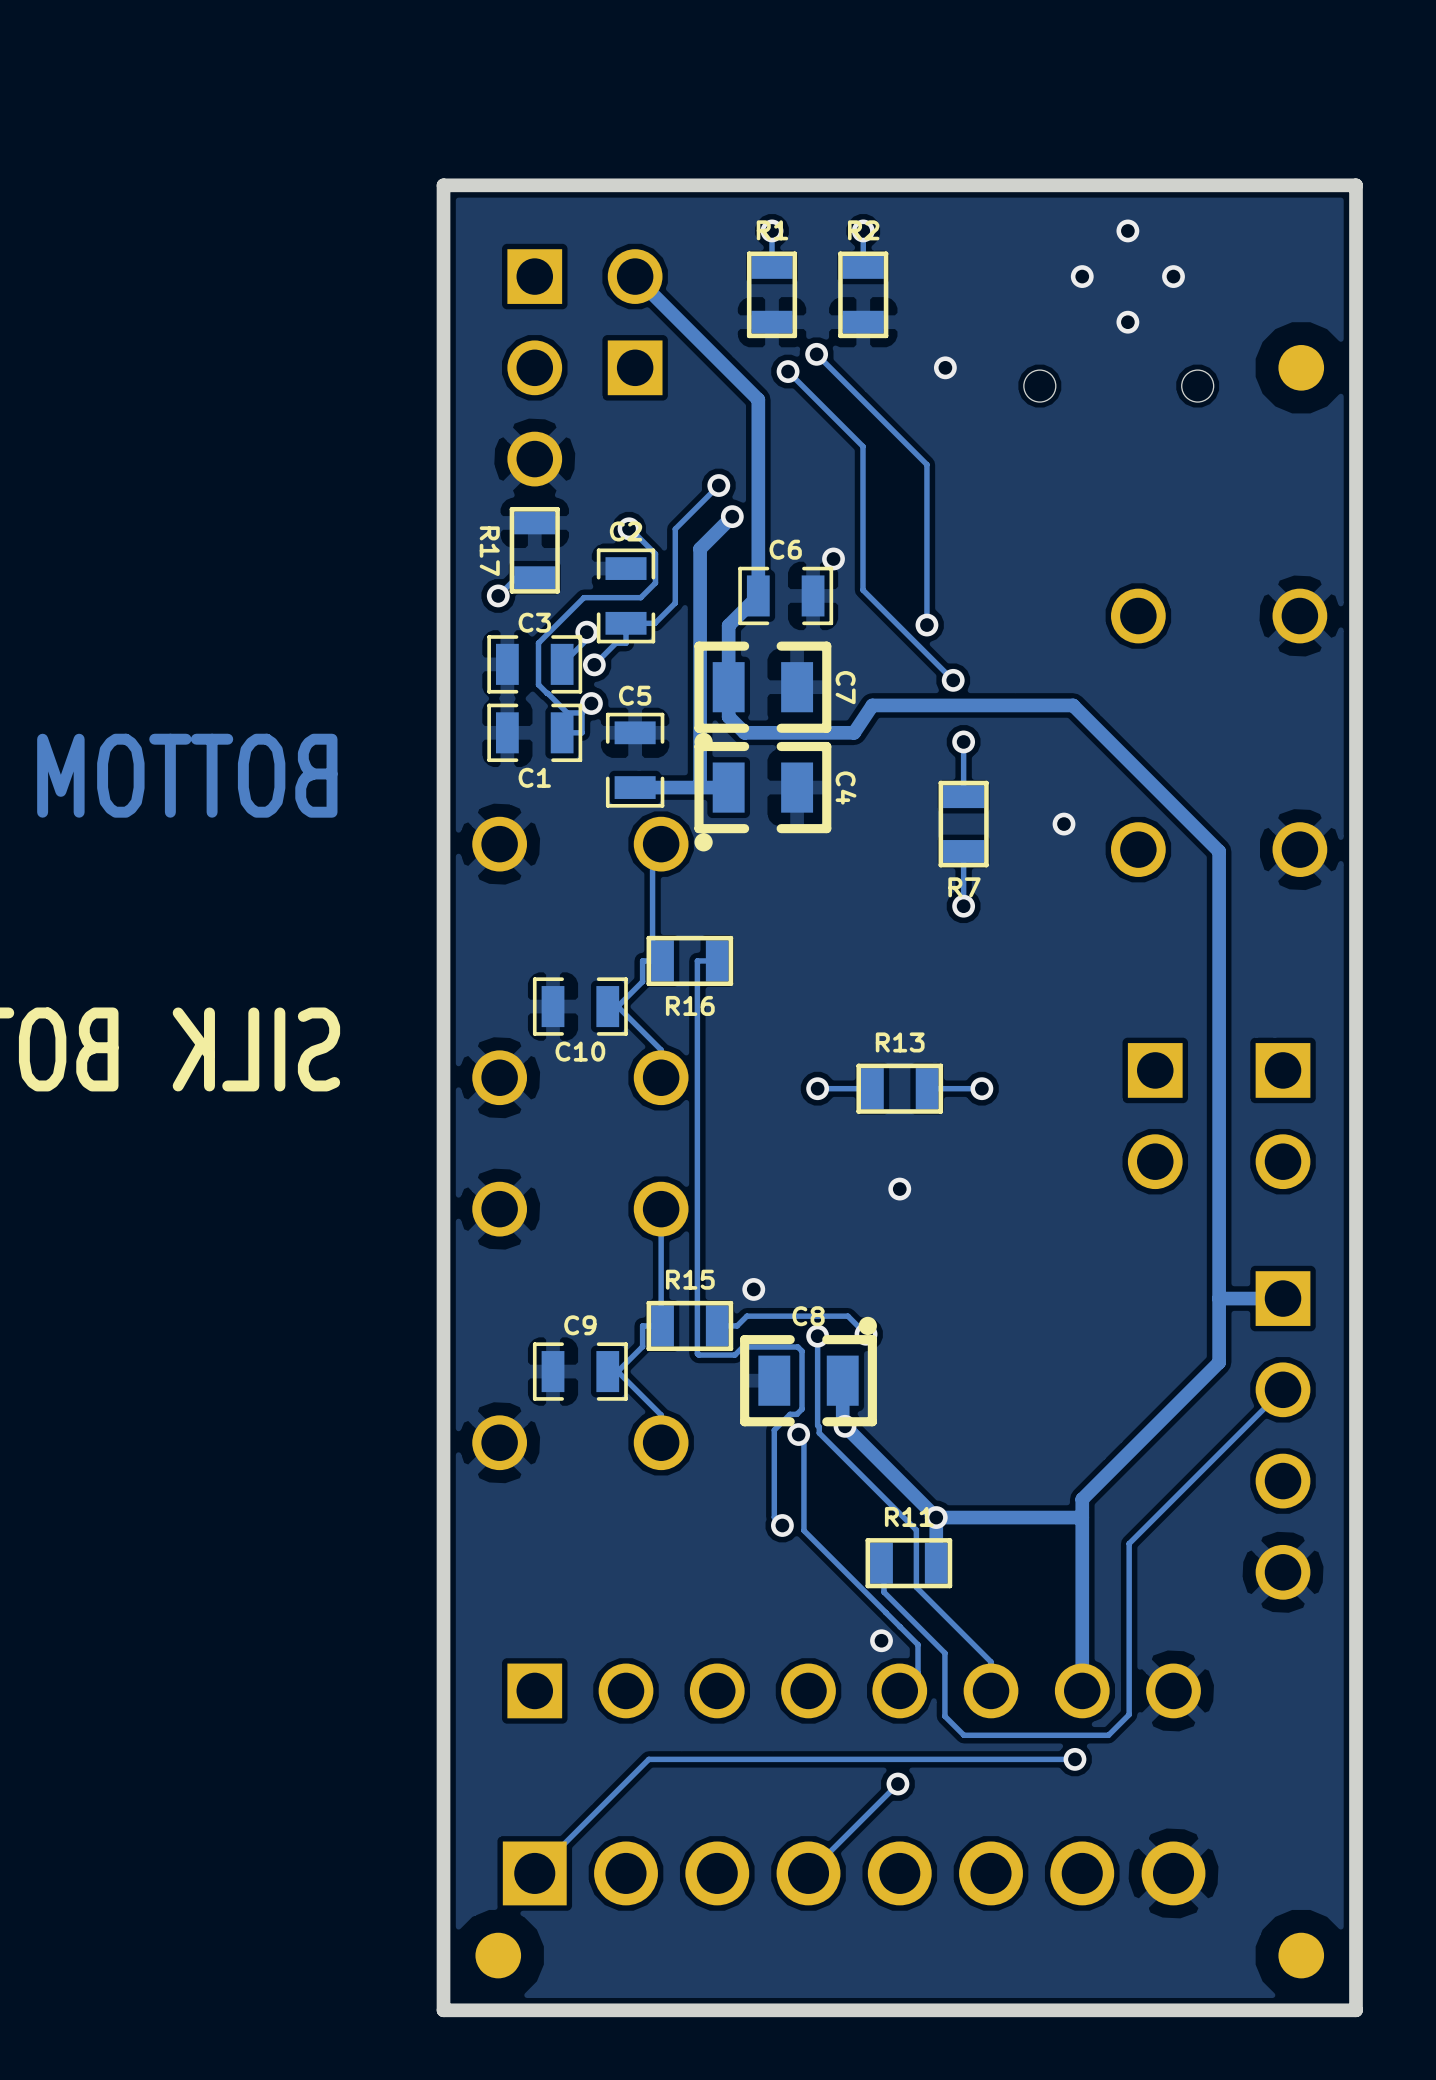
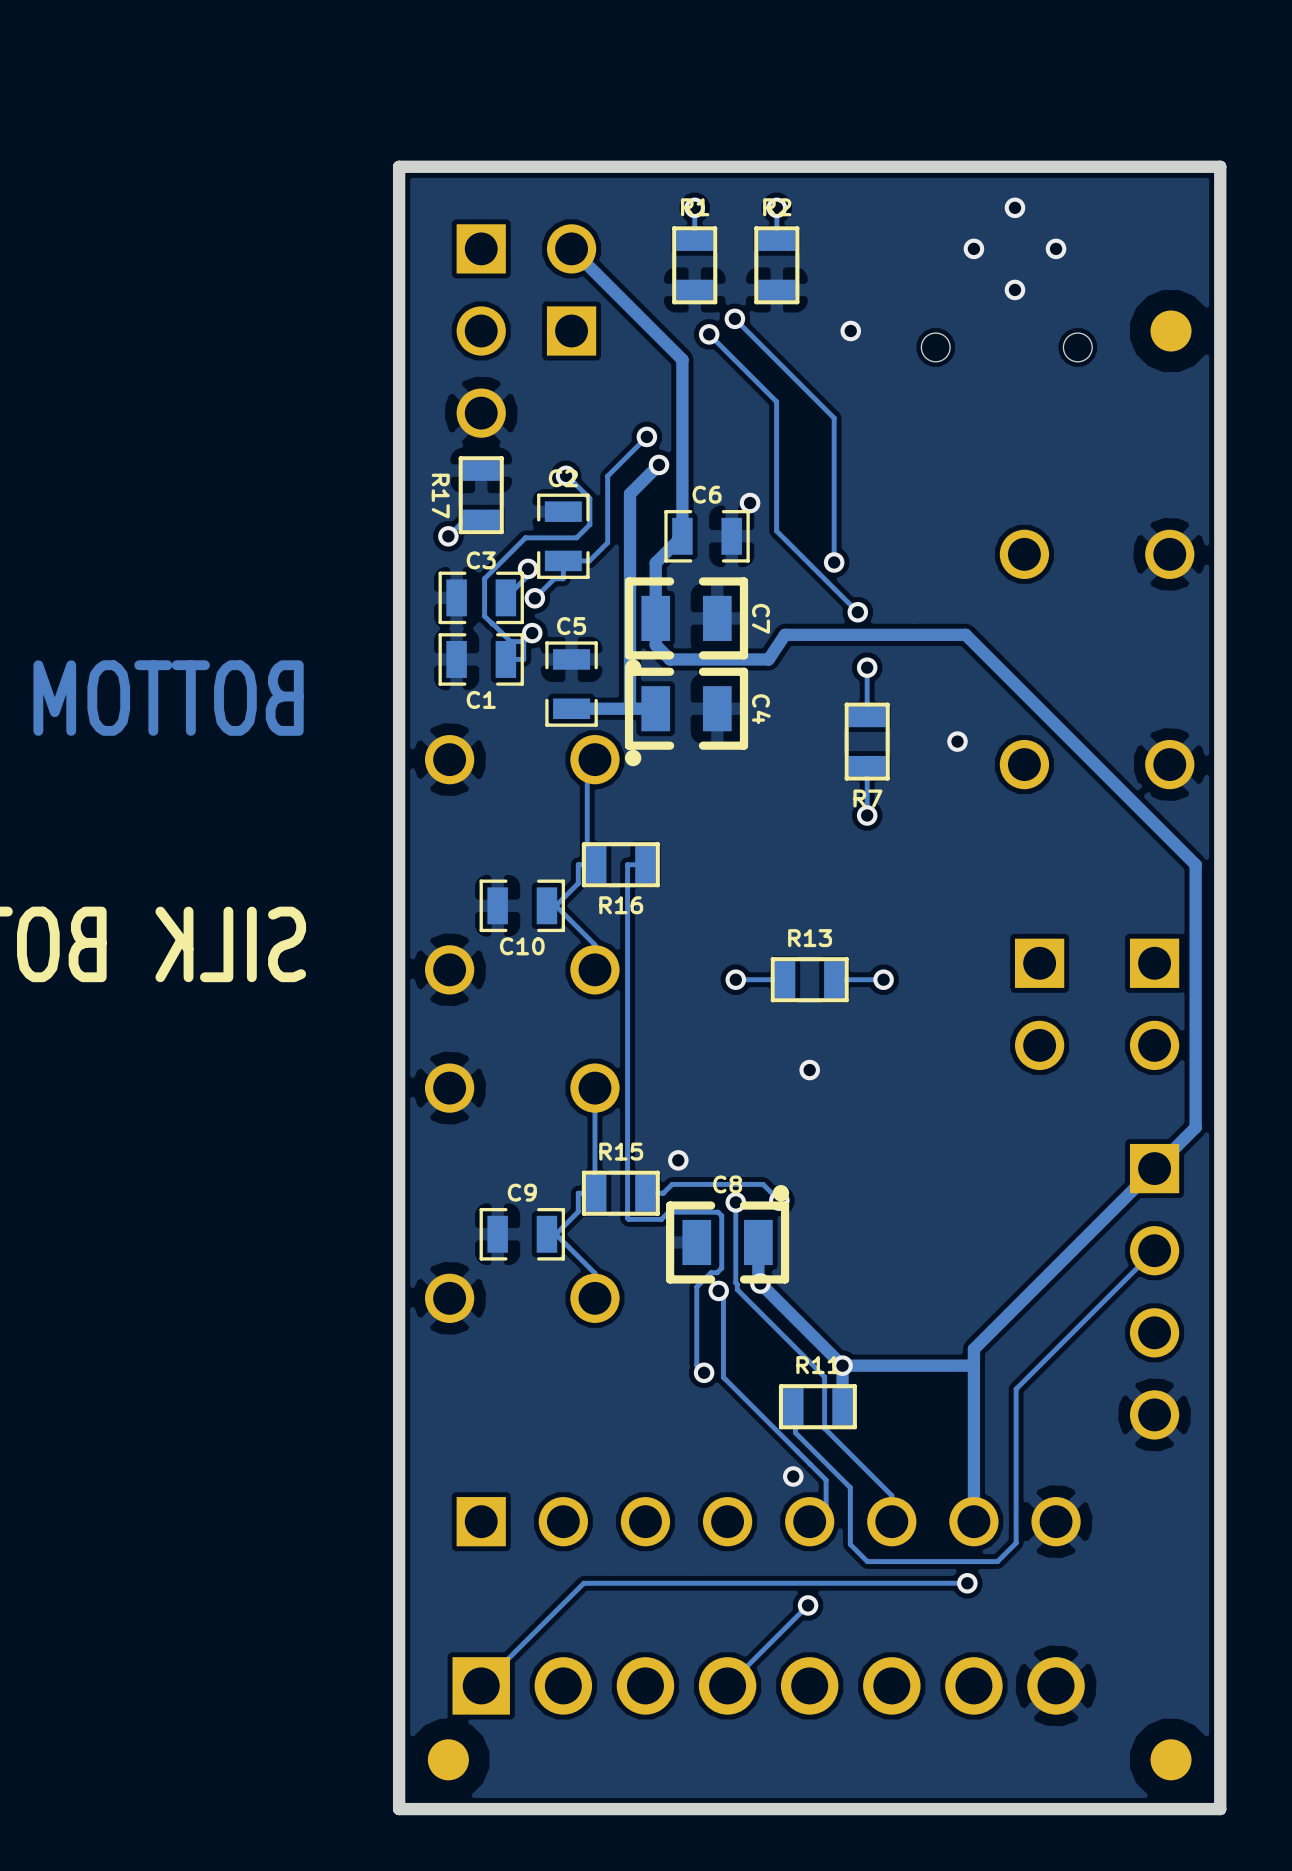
track: (1219, 851) (1219, 1362) -> (1097, 766) (1195, 864) (1195, 1127) (1097, 1226)
track: (1283, 1298) (1219, 1298) -> none

